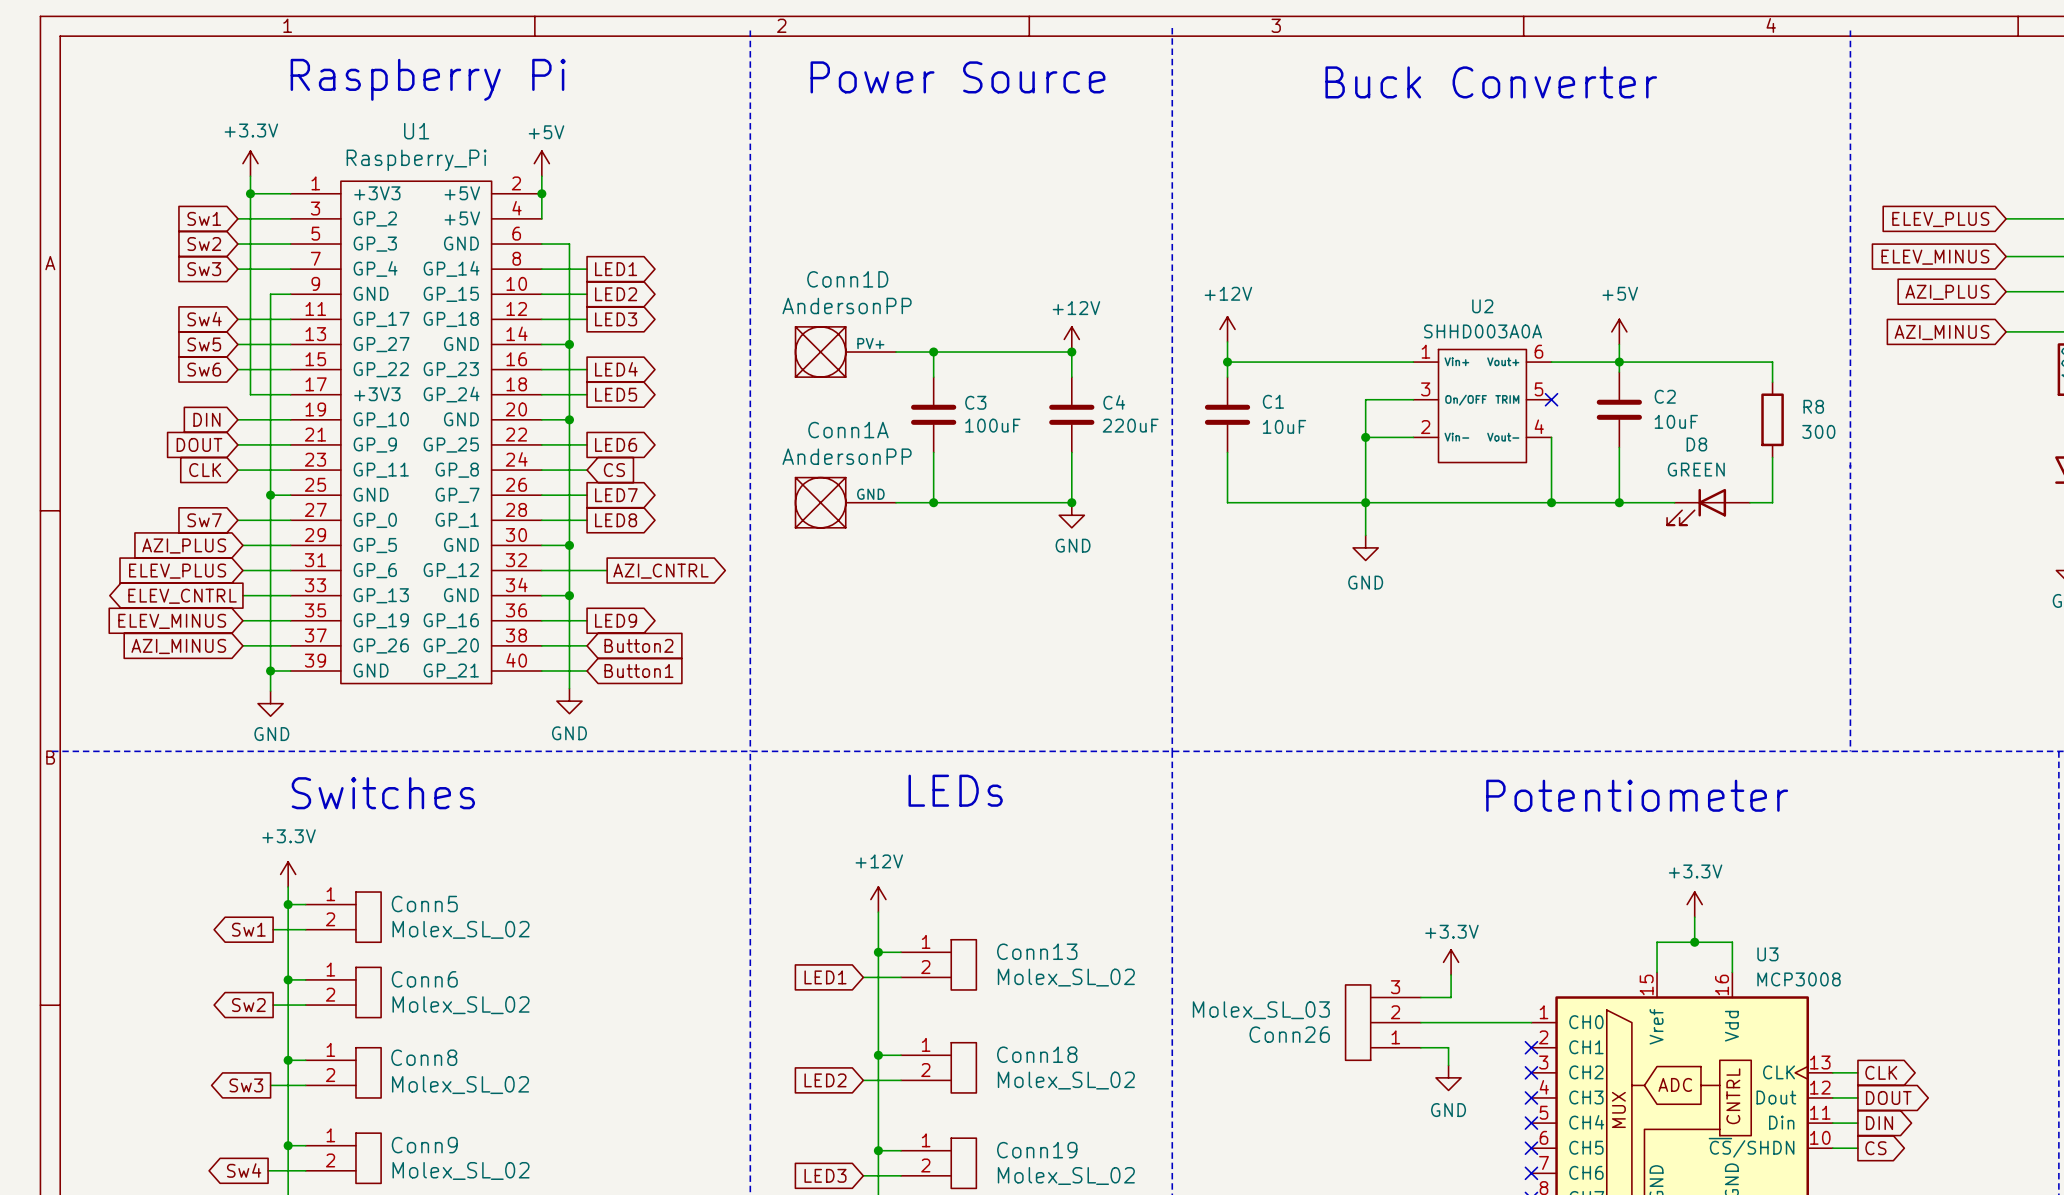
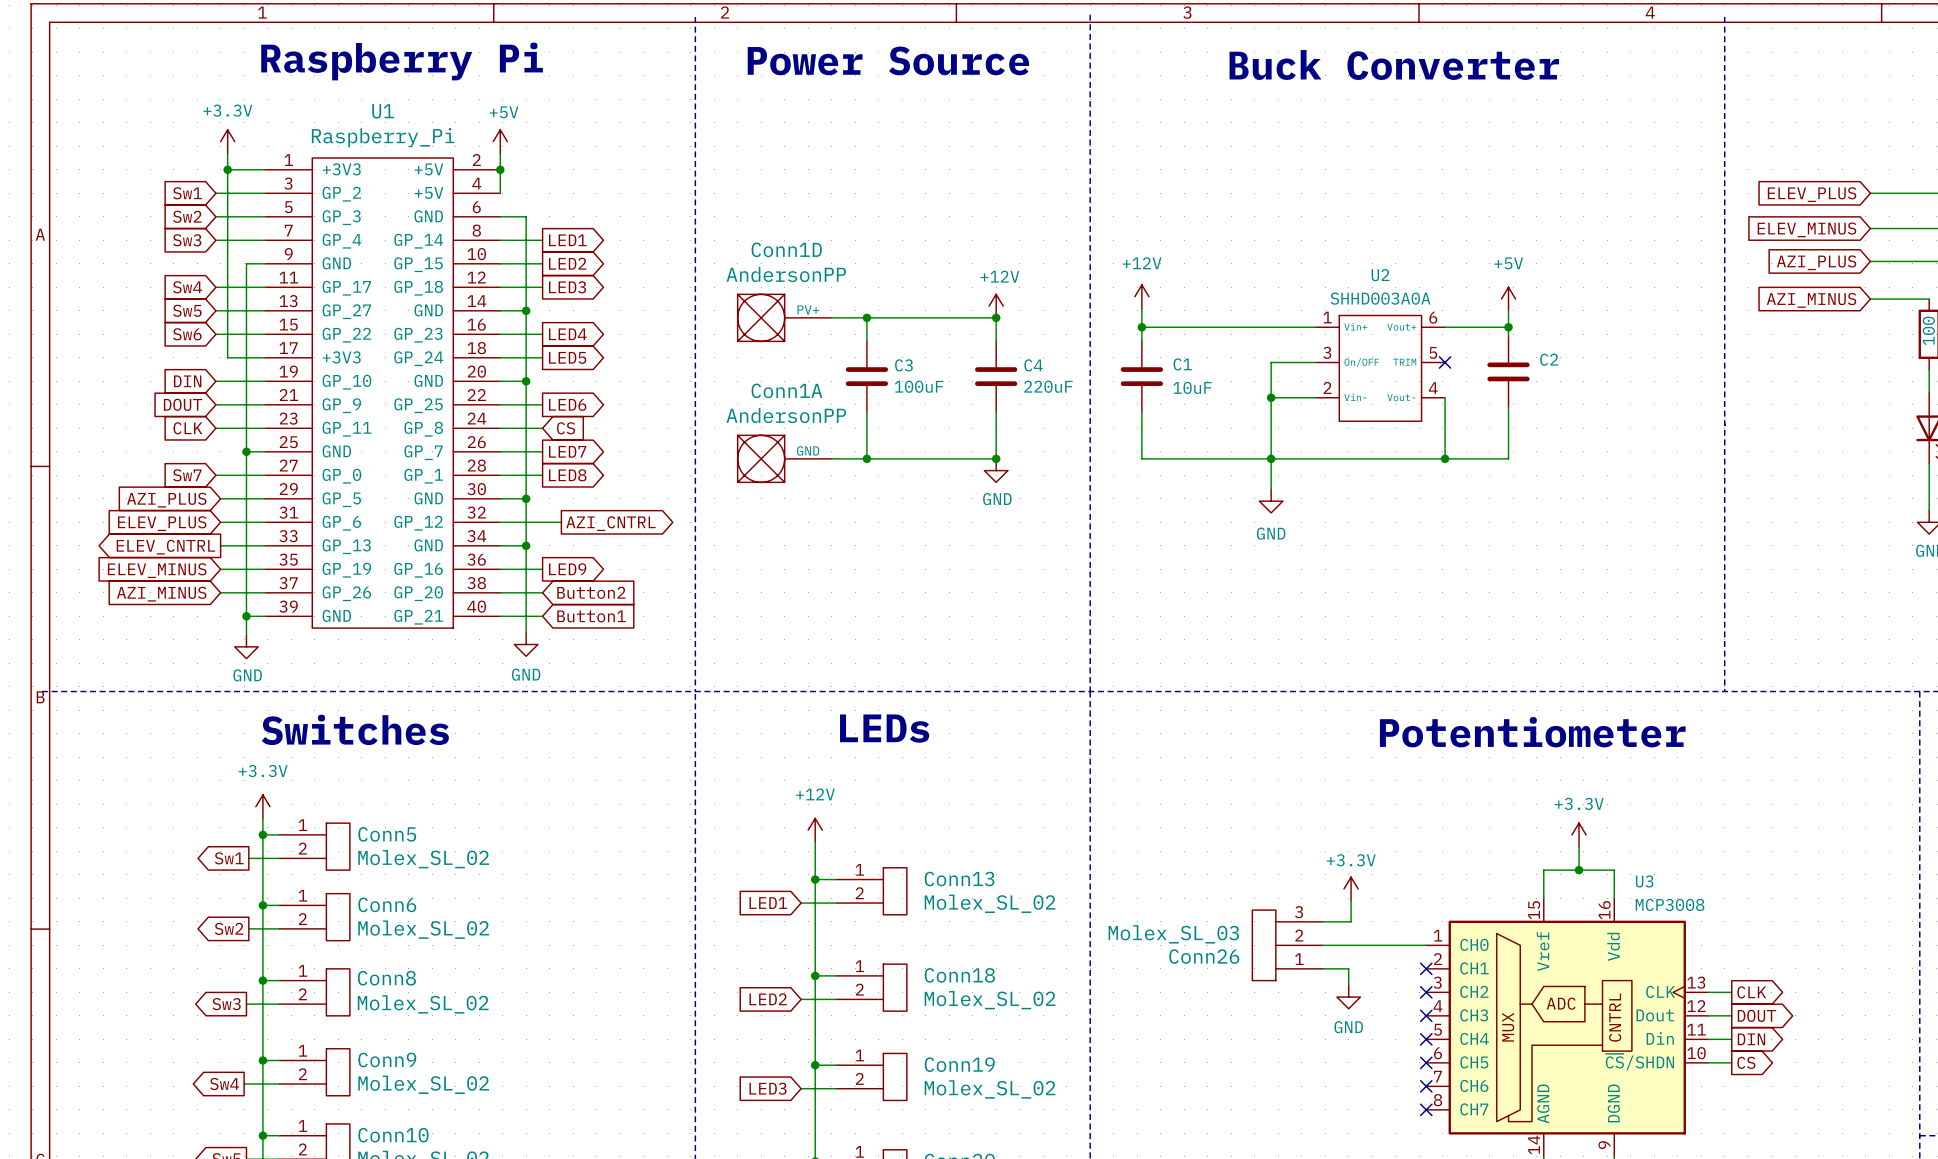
wire: (1619, 362) (1772, 362) (1772, 382) -> none
R8: 300 (1772, 419) -> none
C2 value: 10uF (1676, 421) -> none
wire: (1772, 457) (1772, 502) (1749, 502) -> none
wire: (1619, 502) (1674, 502) -> none
junction: (1619, 502) -> none
D8: GREEN (1708, 507) -> none

